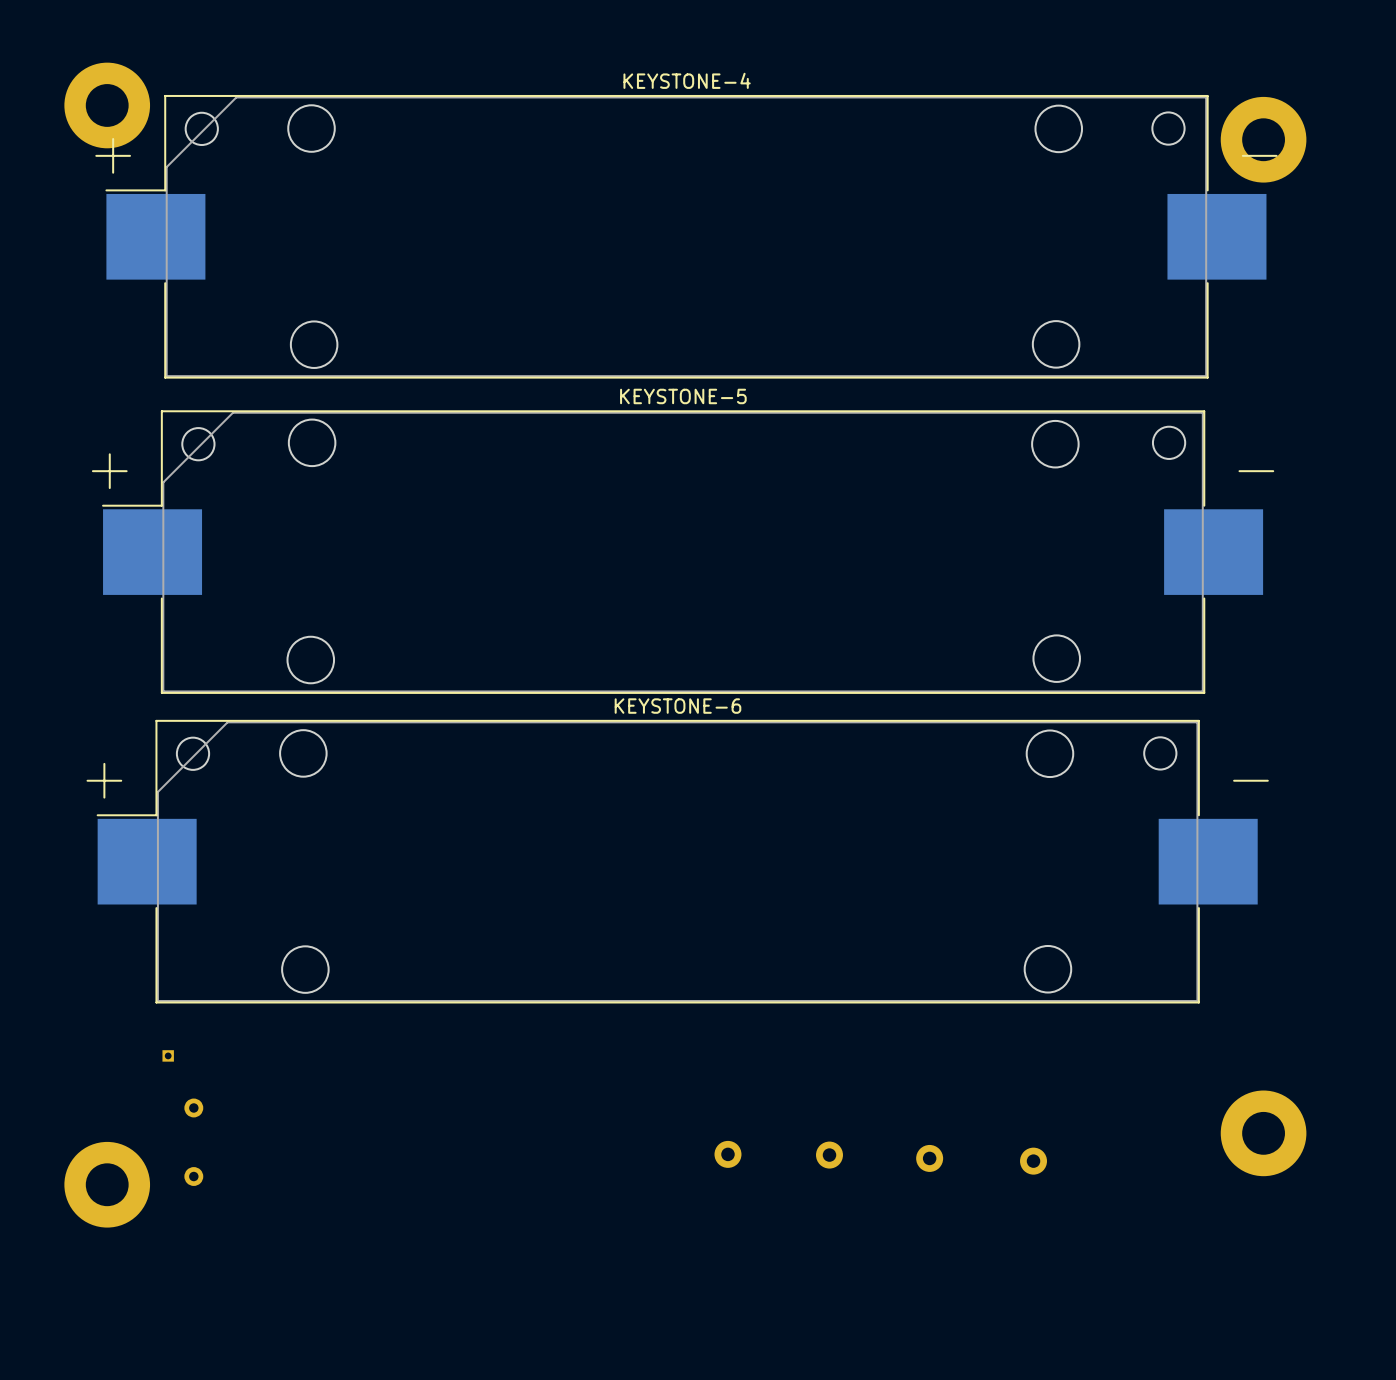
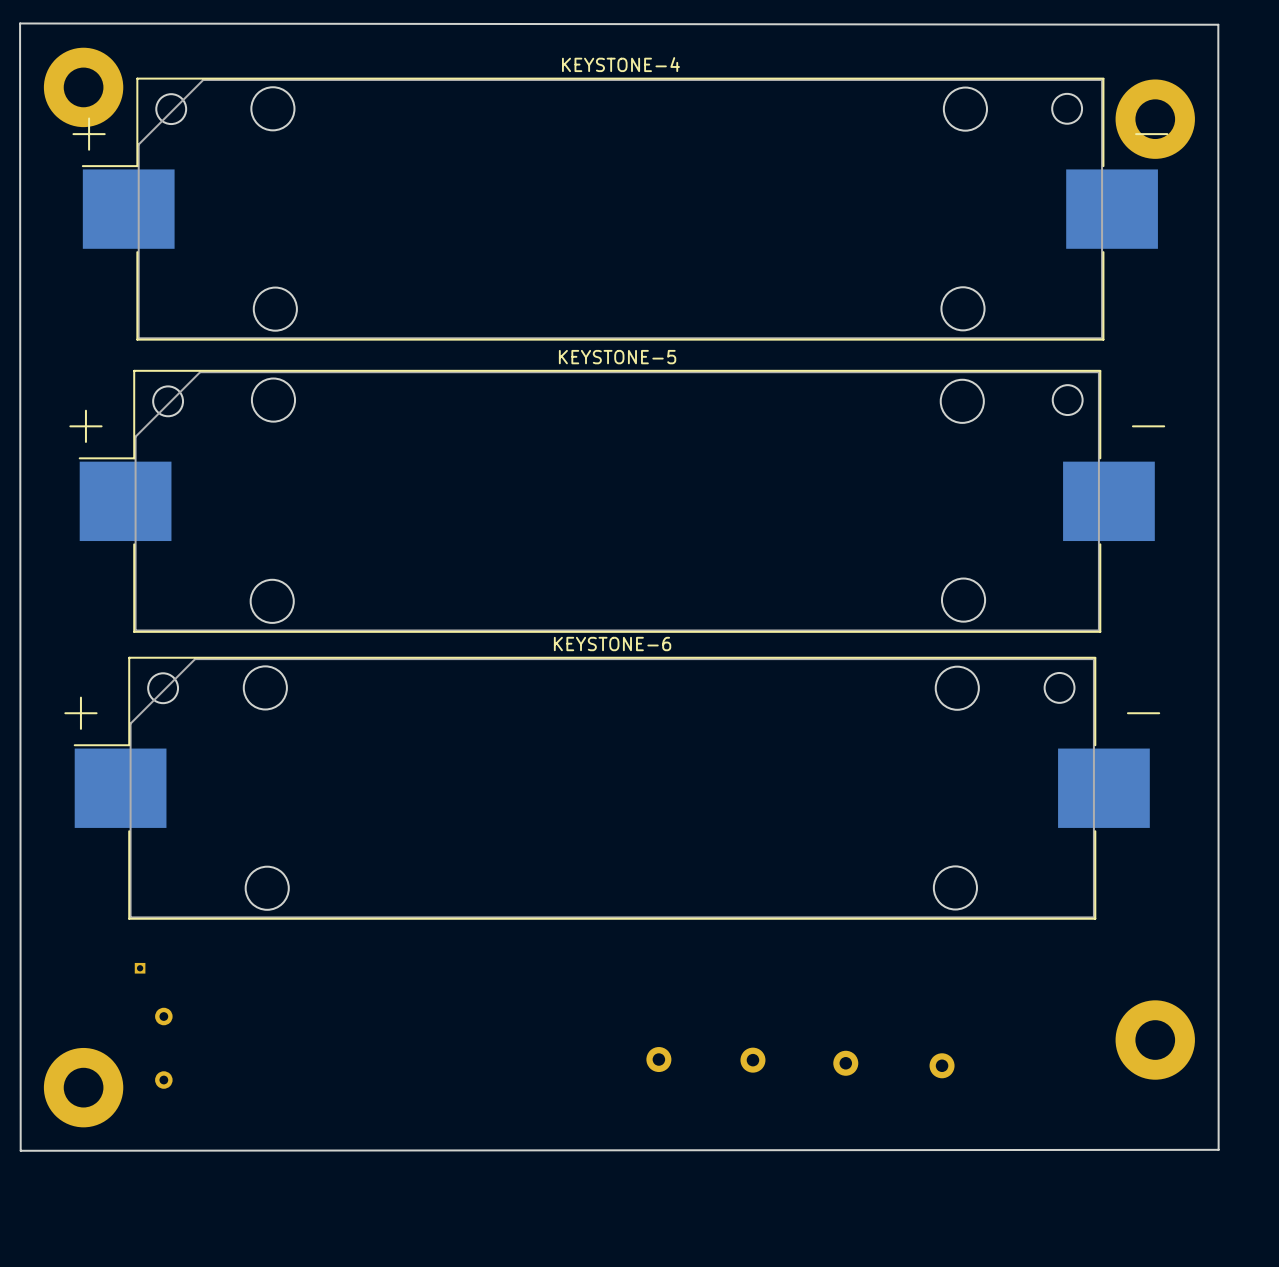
board edge: none -> (20, 23) (20, 1150) (1218, 1149) (1218, 24) (20, 23)

